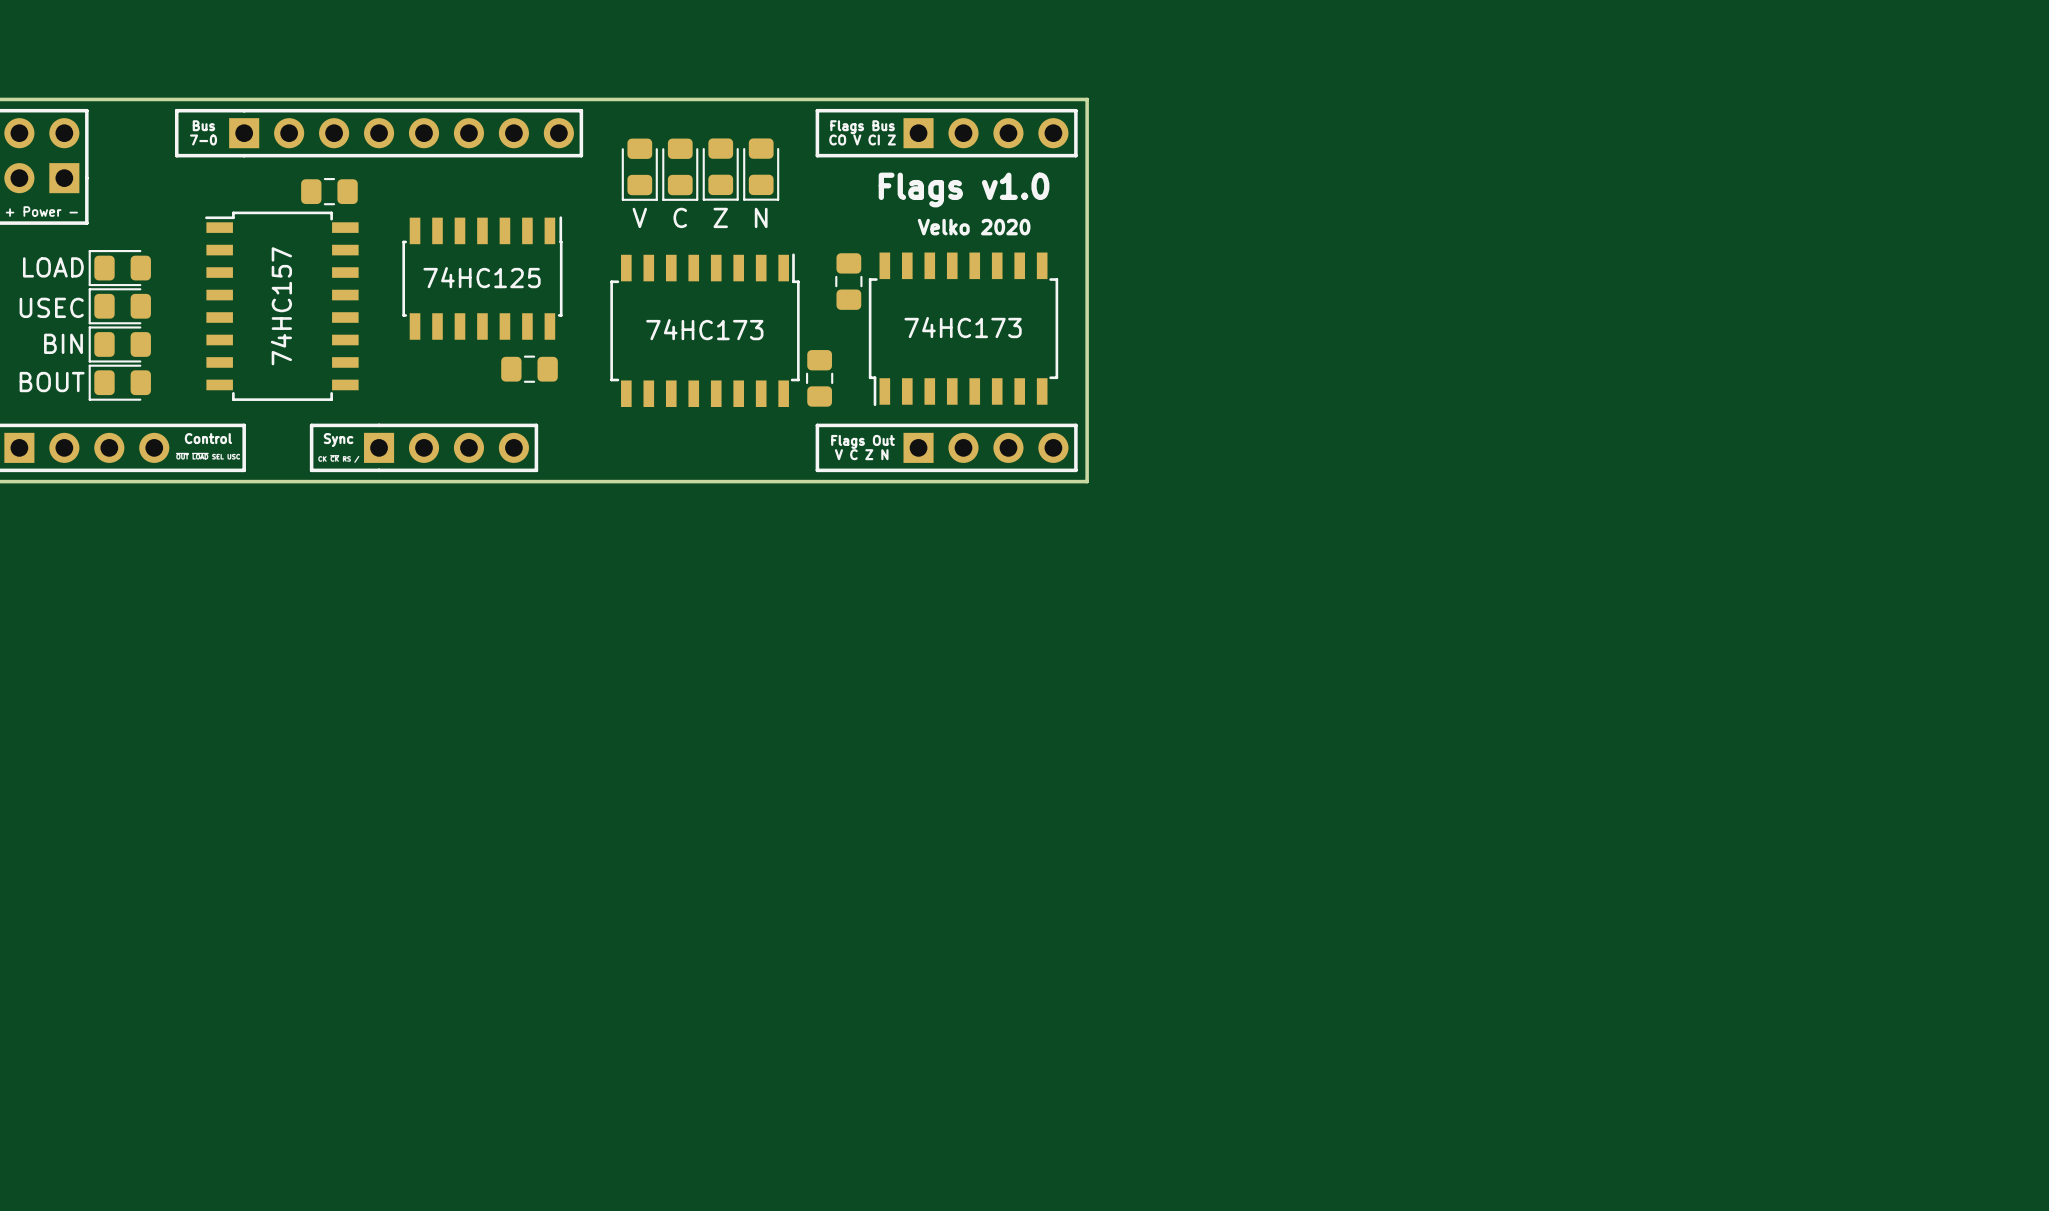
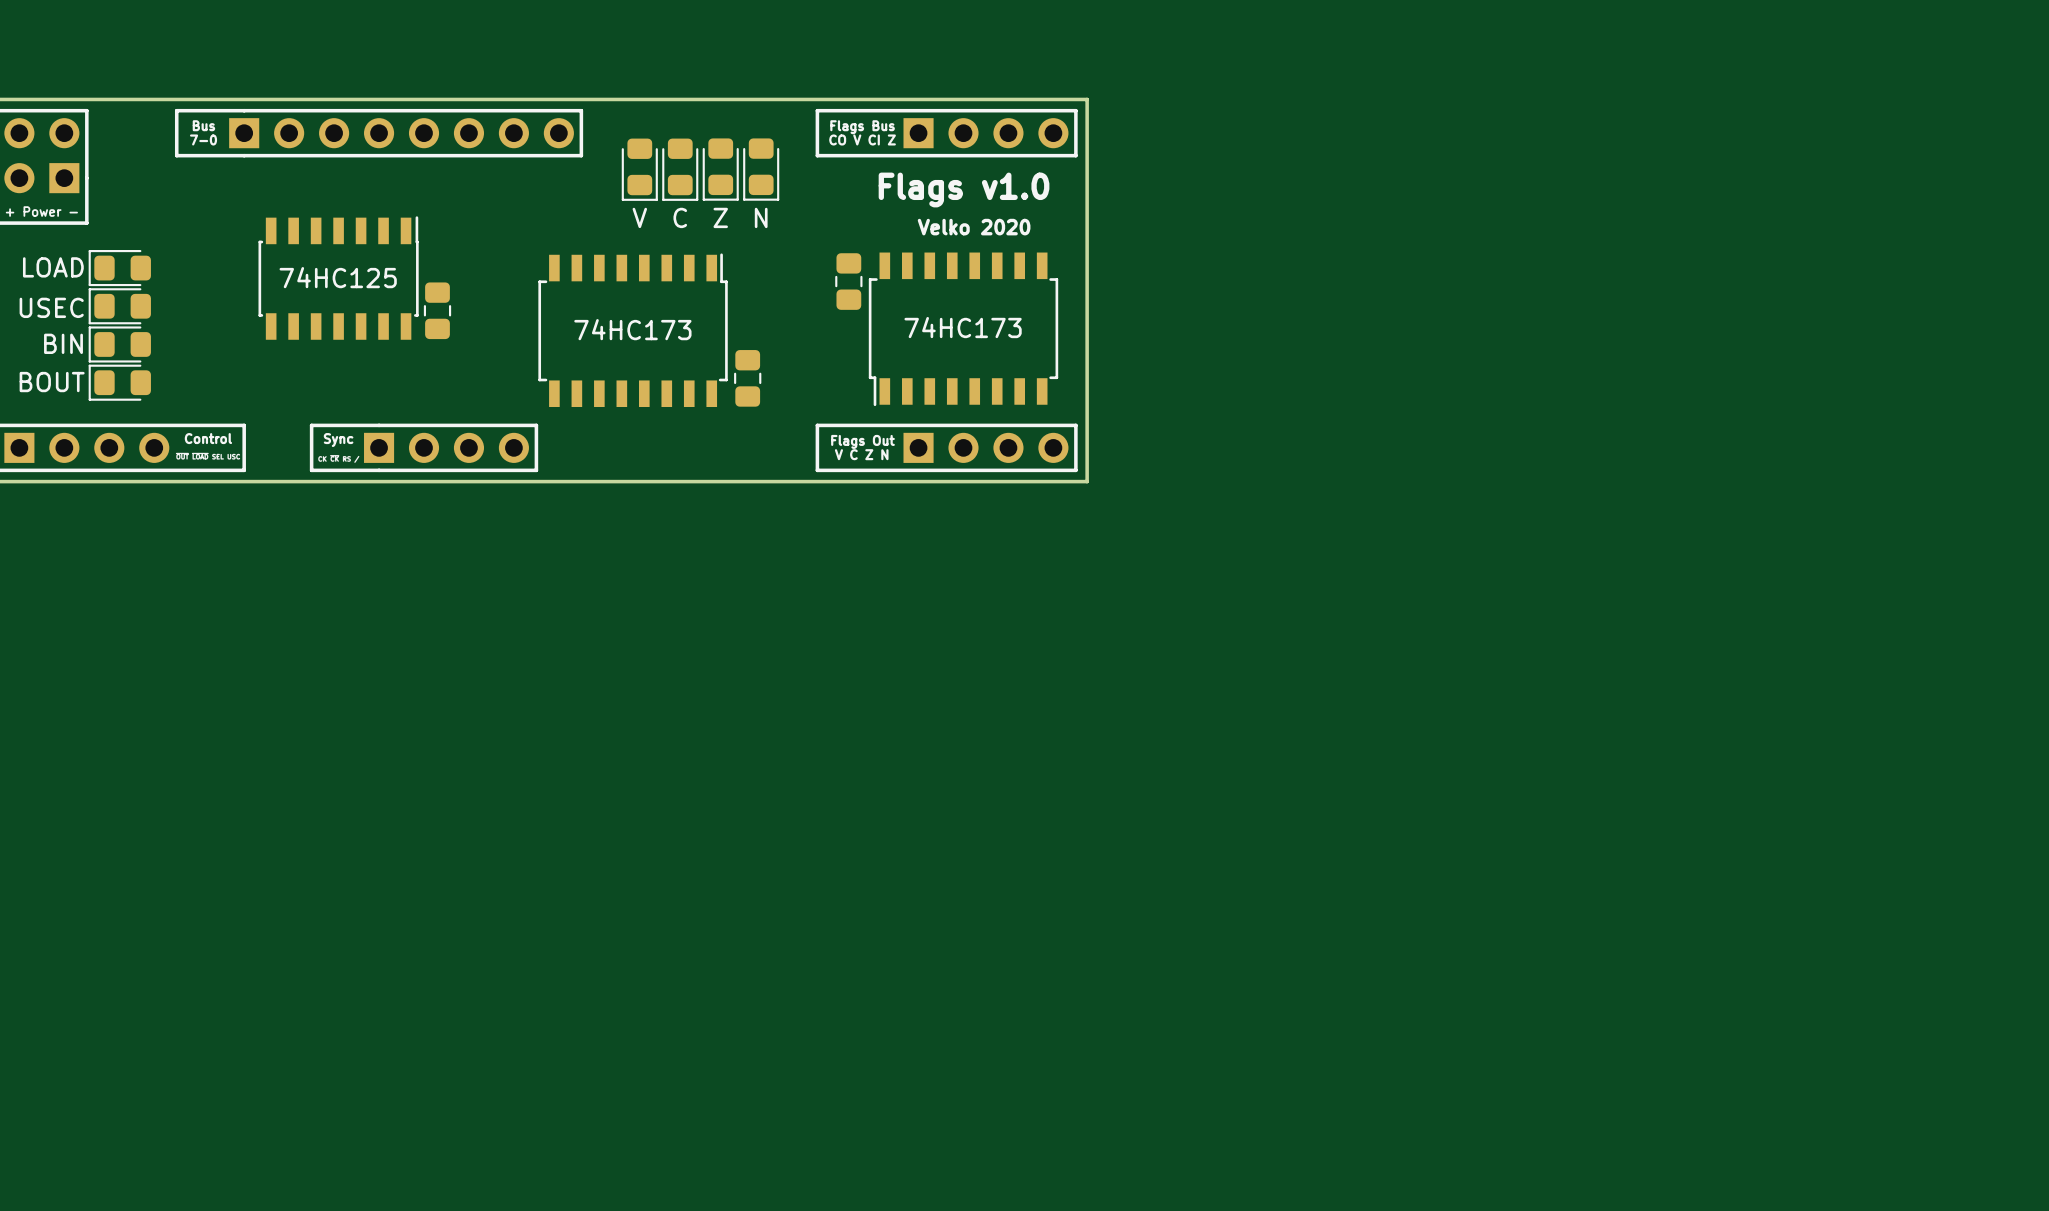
part: (329, 191) -> none
part position: (482, 278) -> (338, 278)
part: 74HC157 (281, 306) -> none
part: none -> (437, 310)
part position: (704, 330) -> (633, 330)
part: (529, 369) -> none
part position: (819, 378) -> (747, 378)

